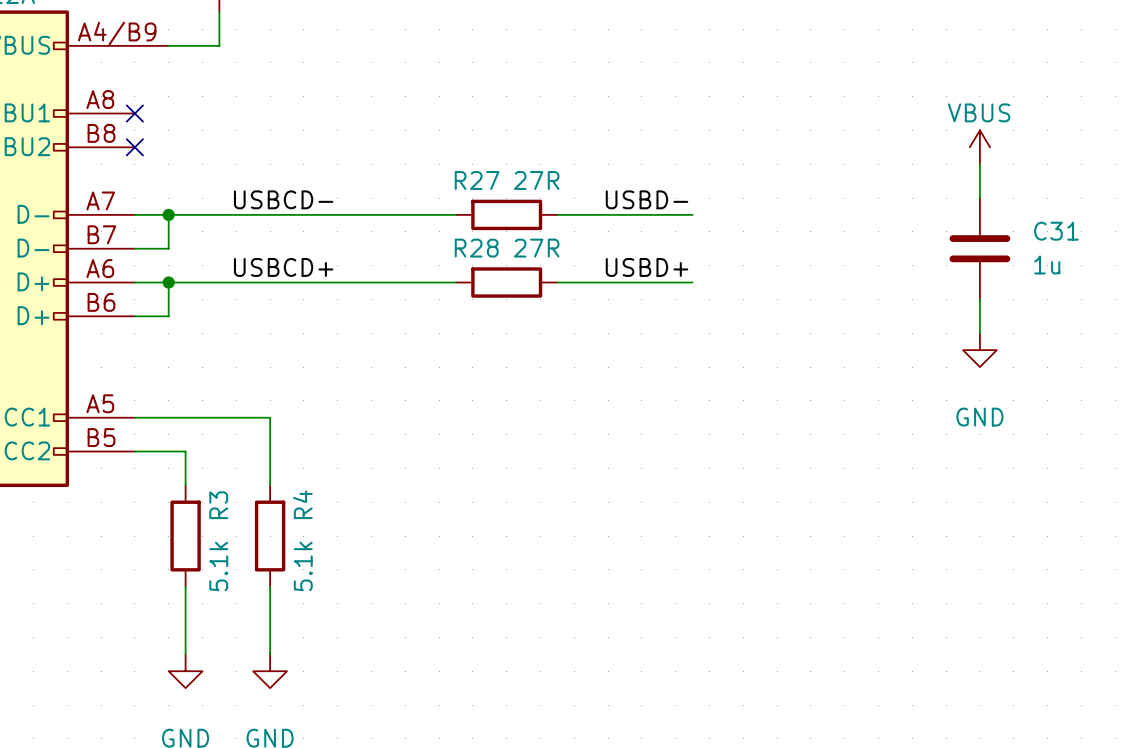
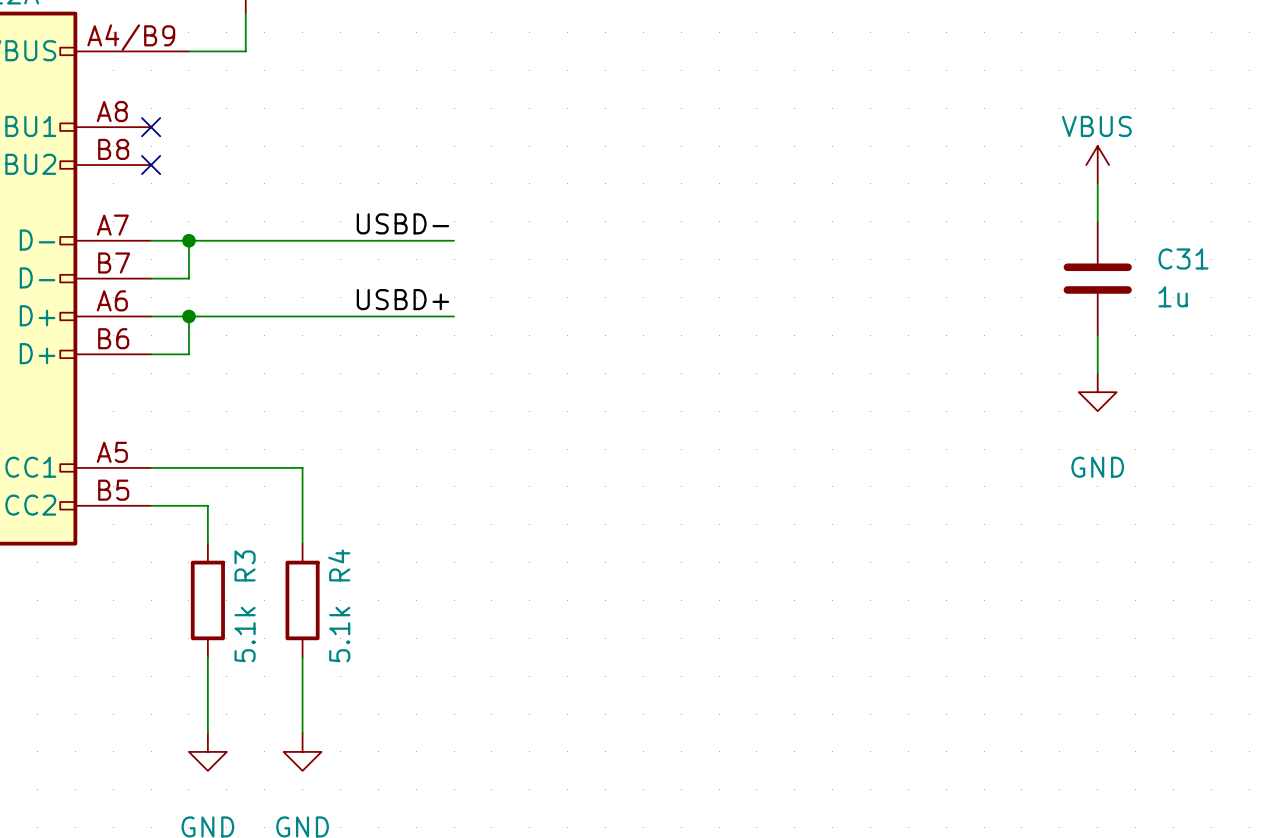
label: USBCD- (283, 199) -> none
label position: USBD- (647, 199) -> USBD- (402, 223)
wire: (405, 214) (456, 214) -> none
R27: 27R (506, 214) -> none
wire: (557, 214) (692, 214) -> none
label: USBCD+ (283, 267) -> none
label position: USBD+ (647, 267) -> USBD+ (402, 299)
wire: (405, 282) (456, 282) -> none
R28: 27R (506, 282) -> none
wire: (557, 282) (692, 282) -> none

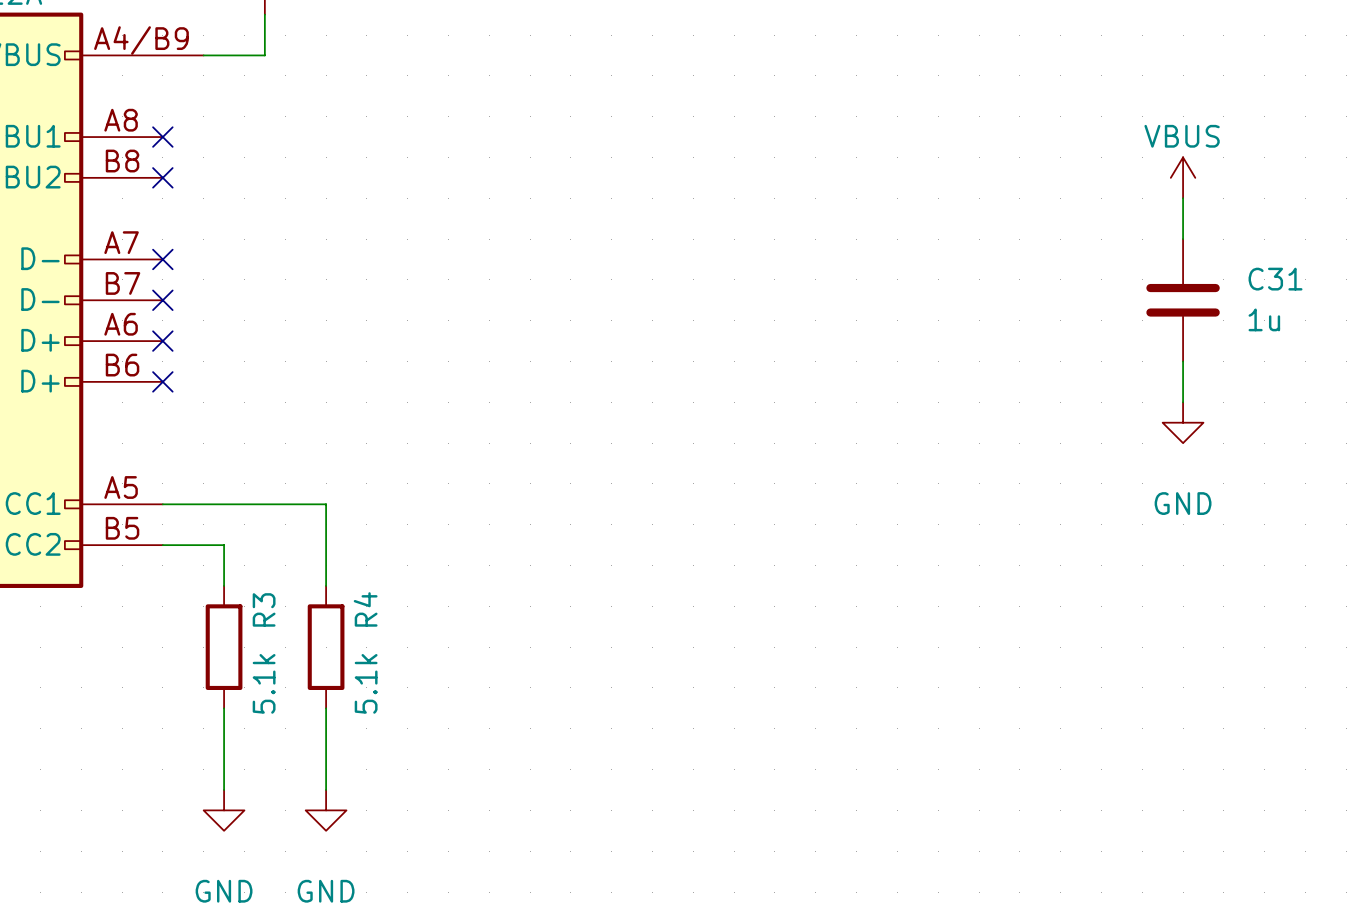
label: USBD- (402, 223) -> none
wire: (151, 240) (454, 240) -> none
no-connect mark: none -> (162, 259)
wire: (188, 240) (188, 278) (151, 278) -> none
junction: (188, 240) -> none
no-connect mark: none -> (162, 300)
label: USBD+ (402, 299) -> none
wire: (151, 316) (454, 316) -> none
no-connect mark: none -> (162, 341)
wire: (188, 316) (188, 354) (151, 354) -> none
junction: (188, 316) -> none
no-connect mark: none -> (162, 381)

